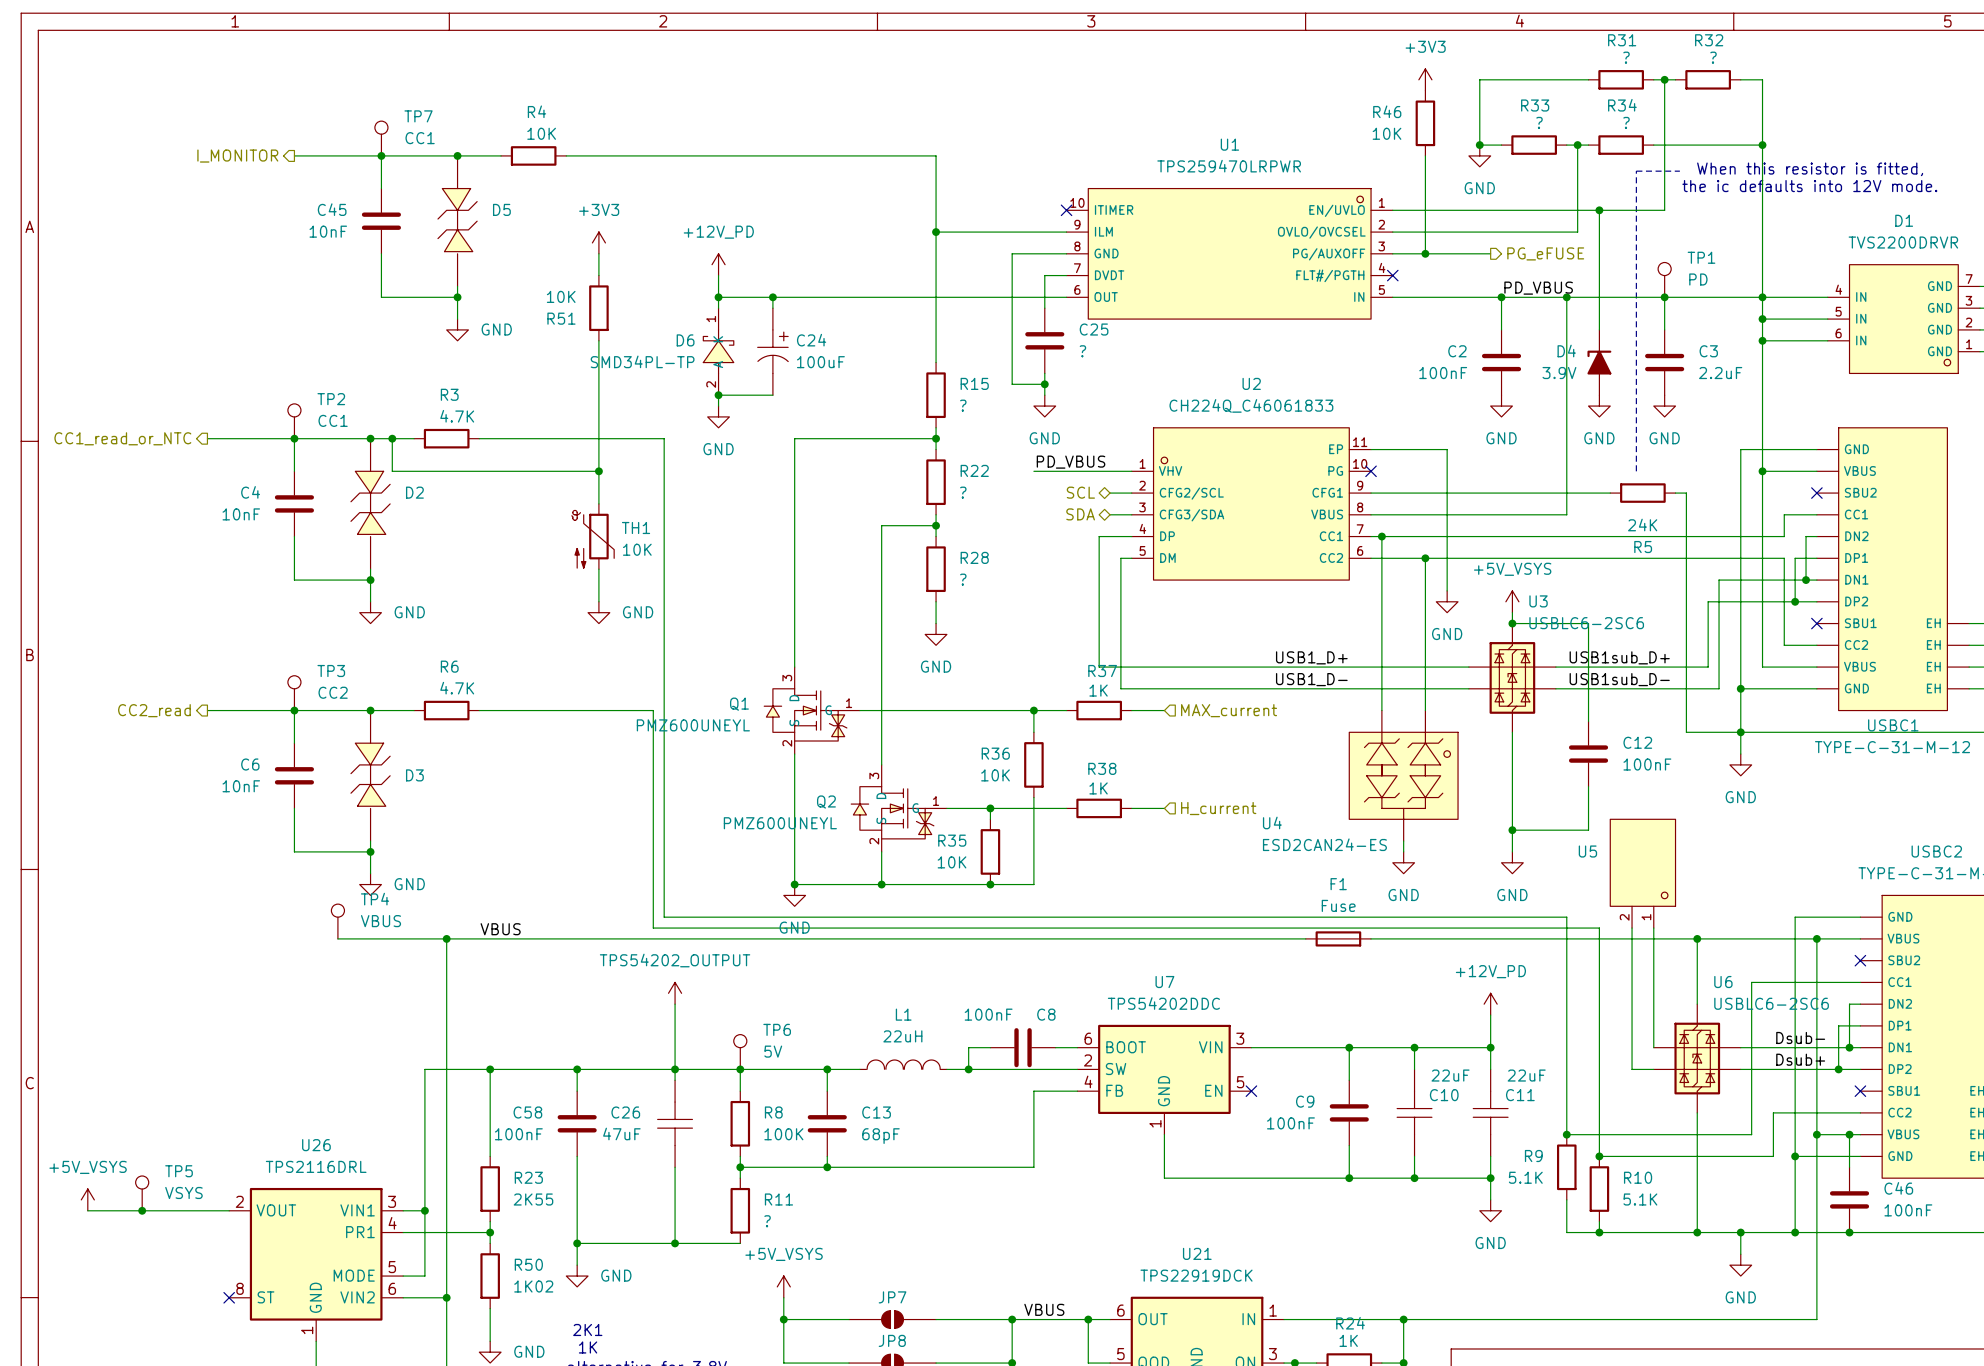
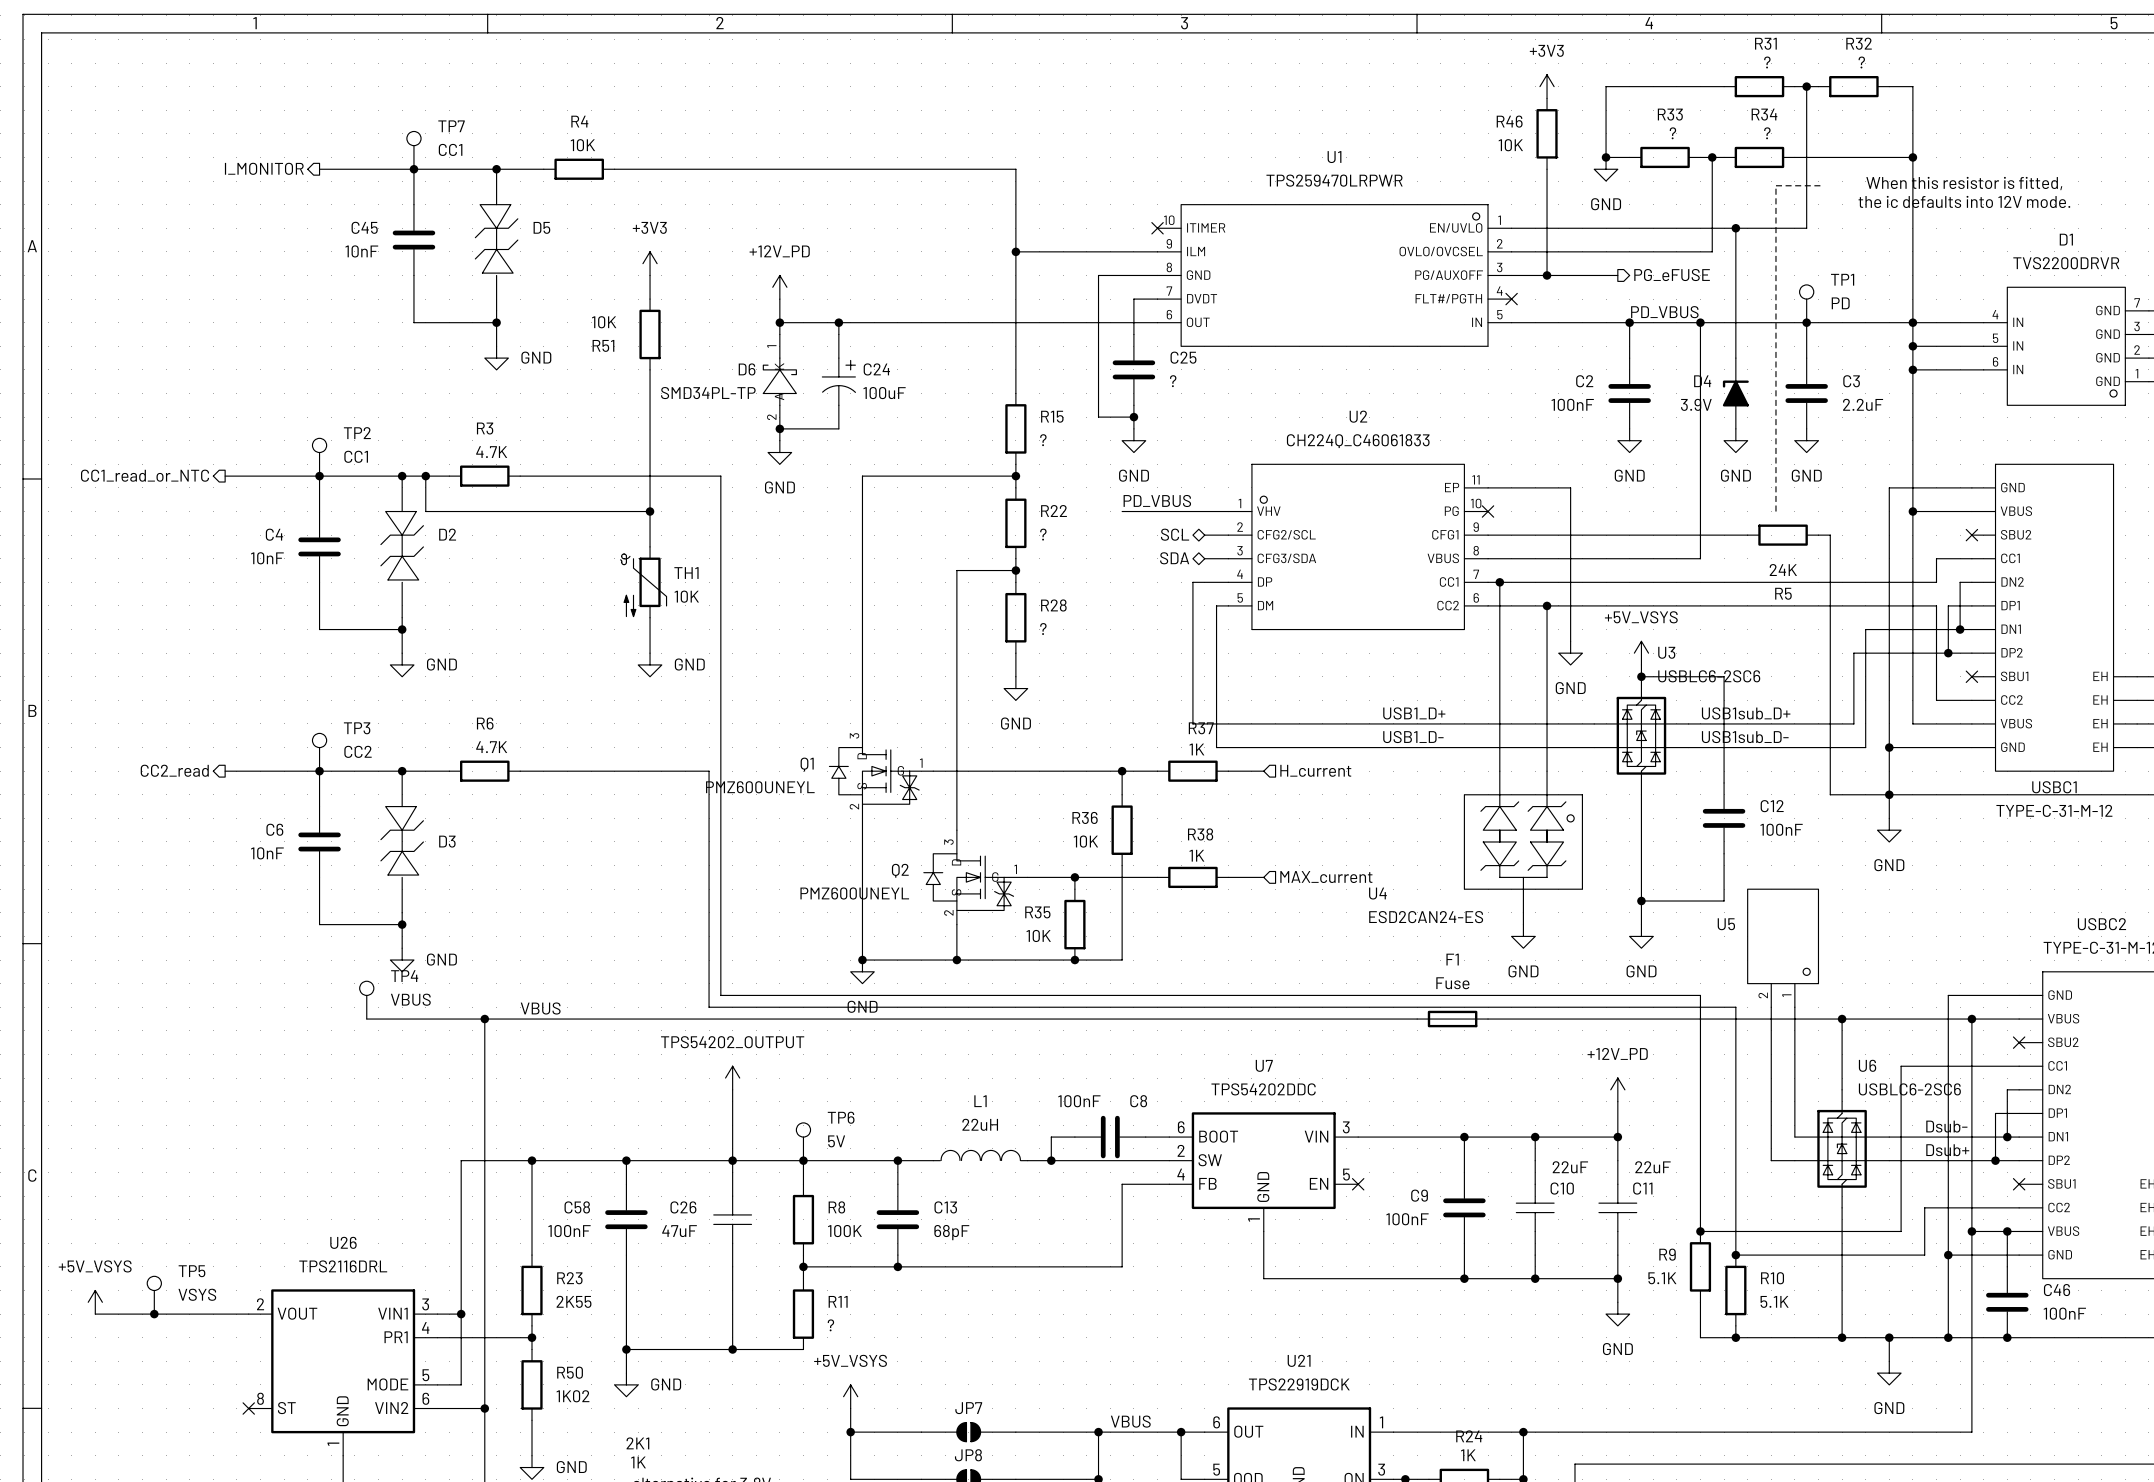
hierarchical label: MAX_current (1229, 710) -> H_current (1315, 770)
hierarchical label: H_current (1218, 808) -> MAX_current (1326, 877)

